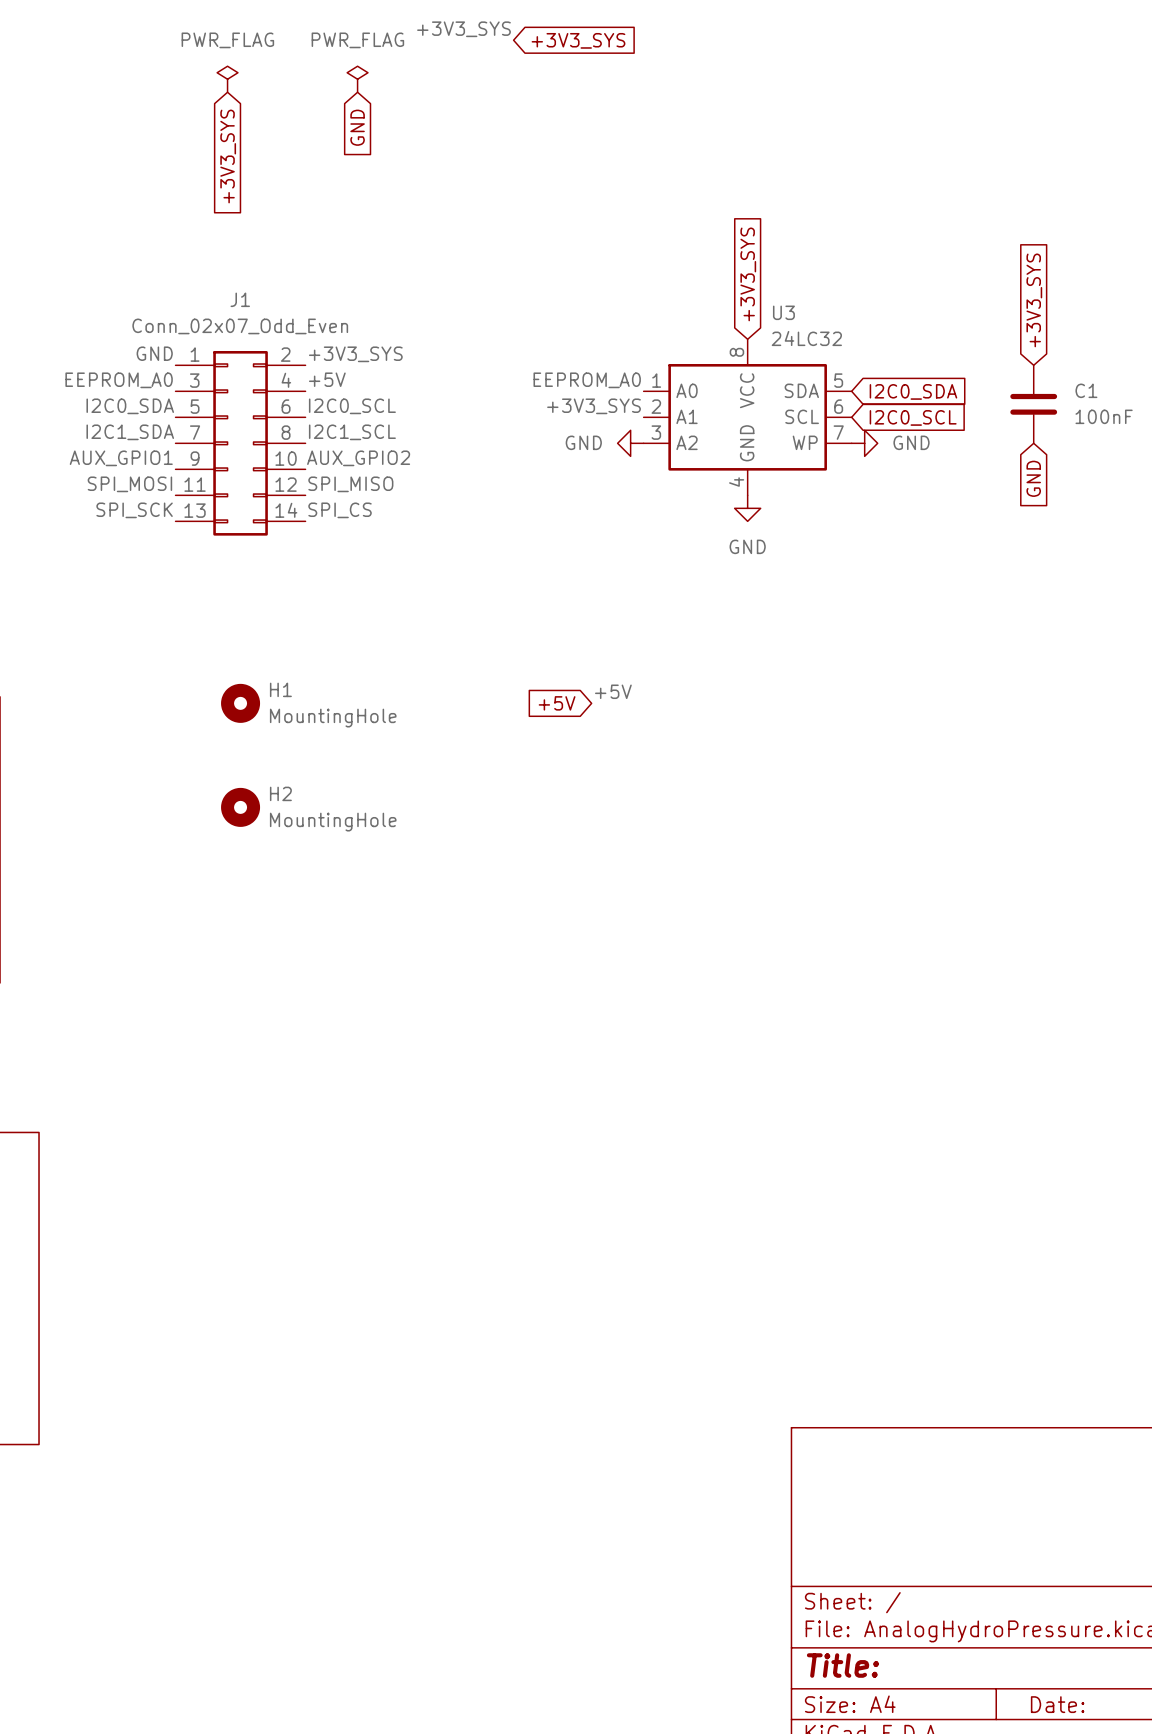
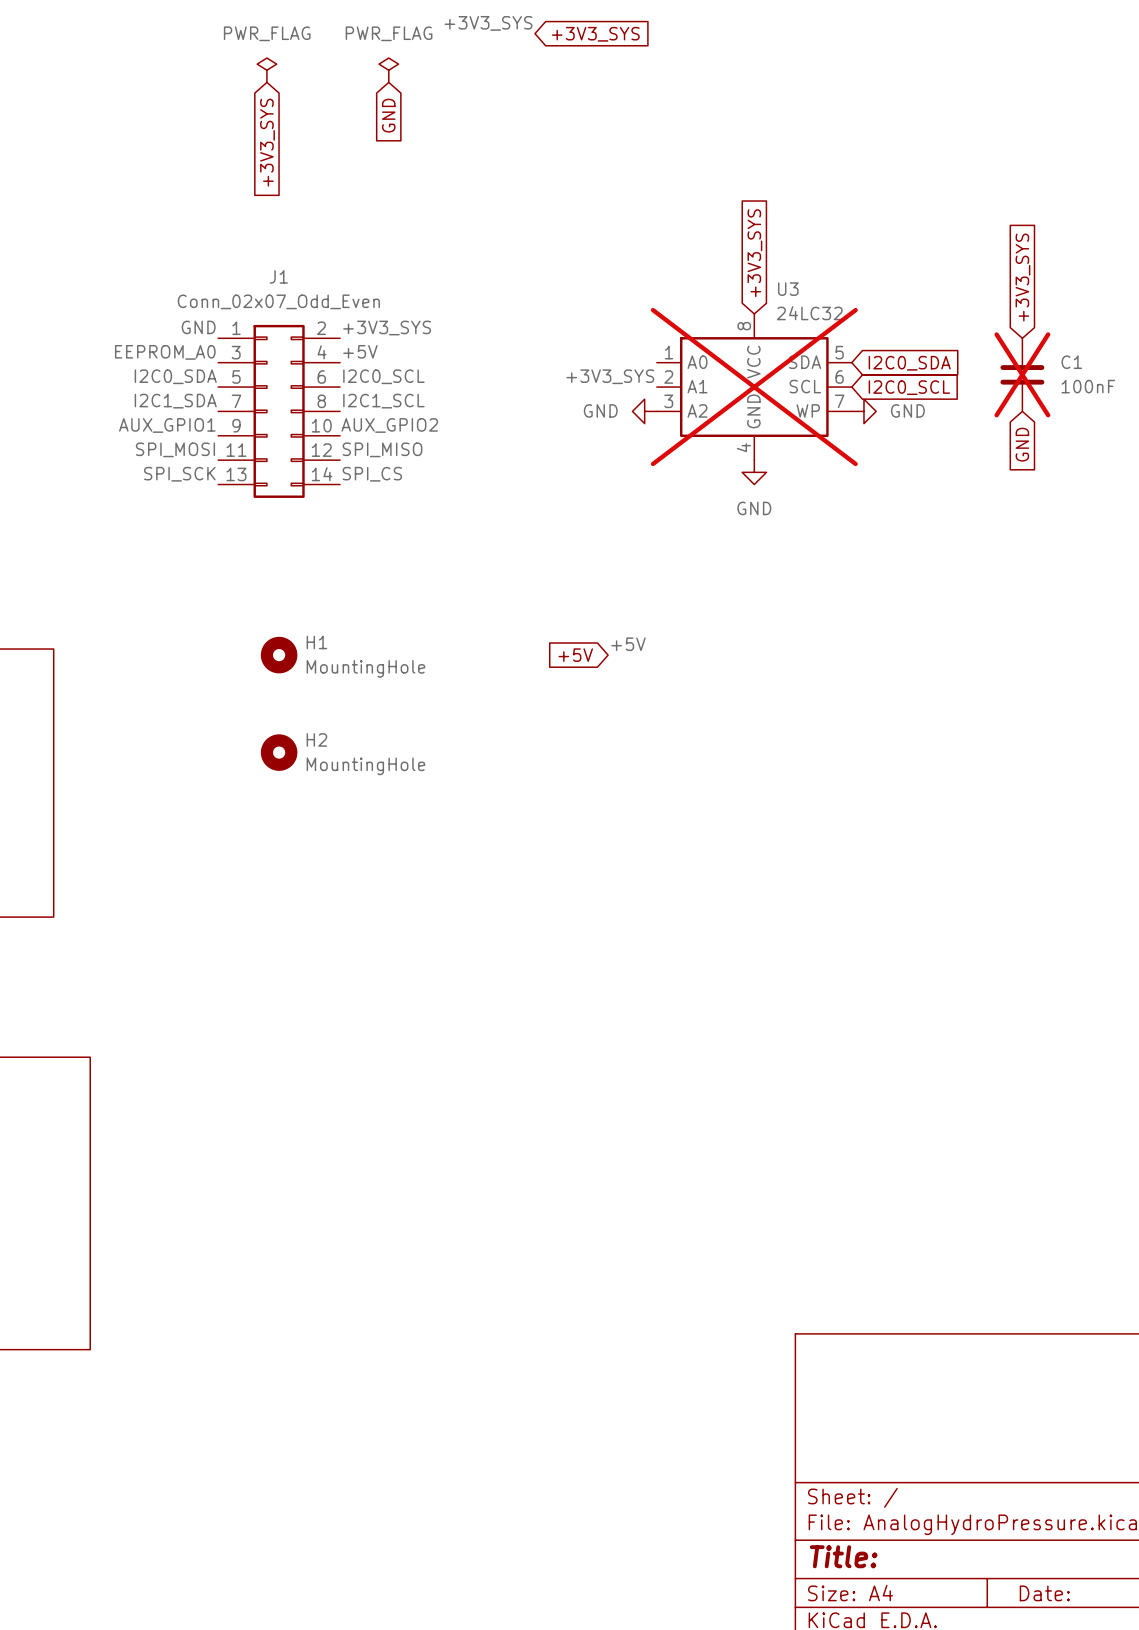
label: EEPROM_A0 (587, 380) -> none
C1 do-not-place cross: none -> (1022, 374)
U3 do-not-place cross: none -> (754, 387)

